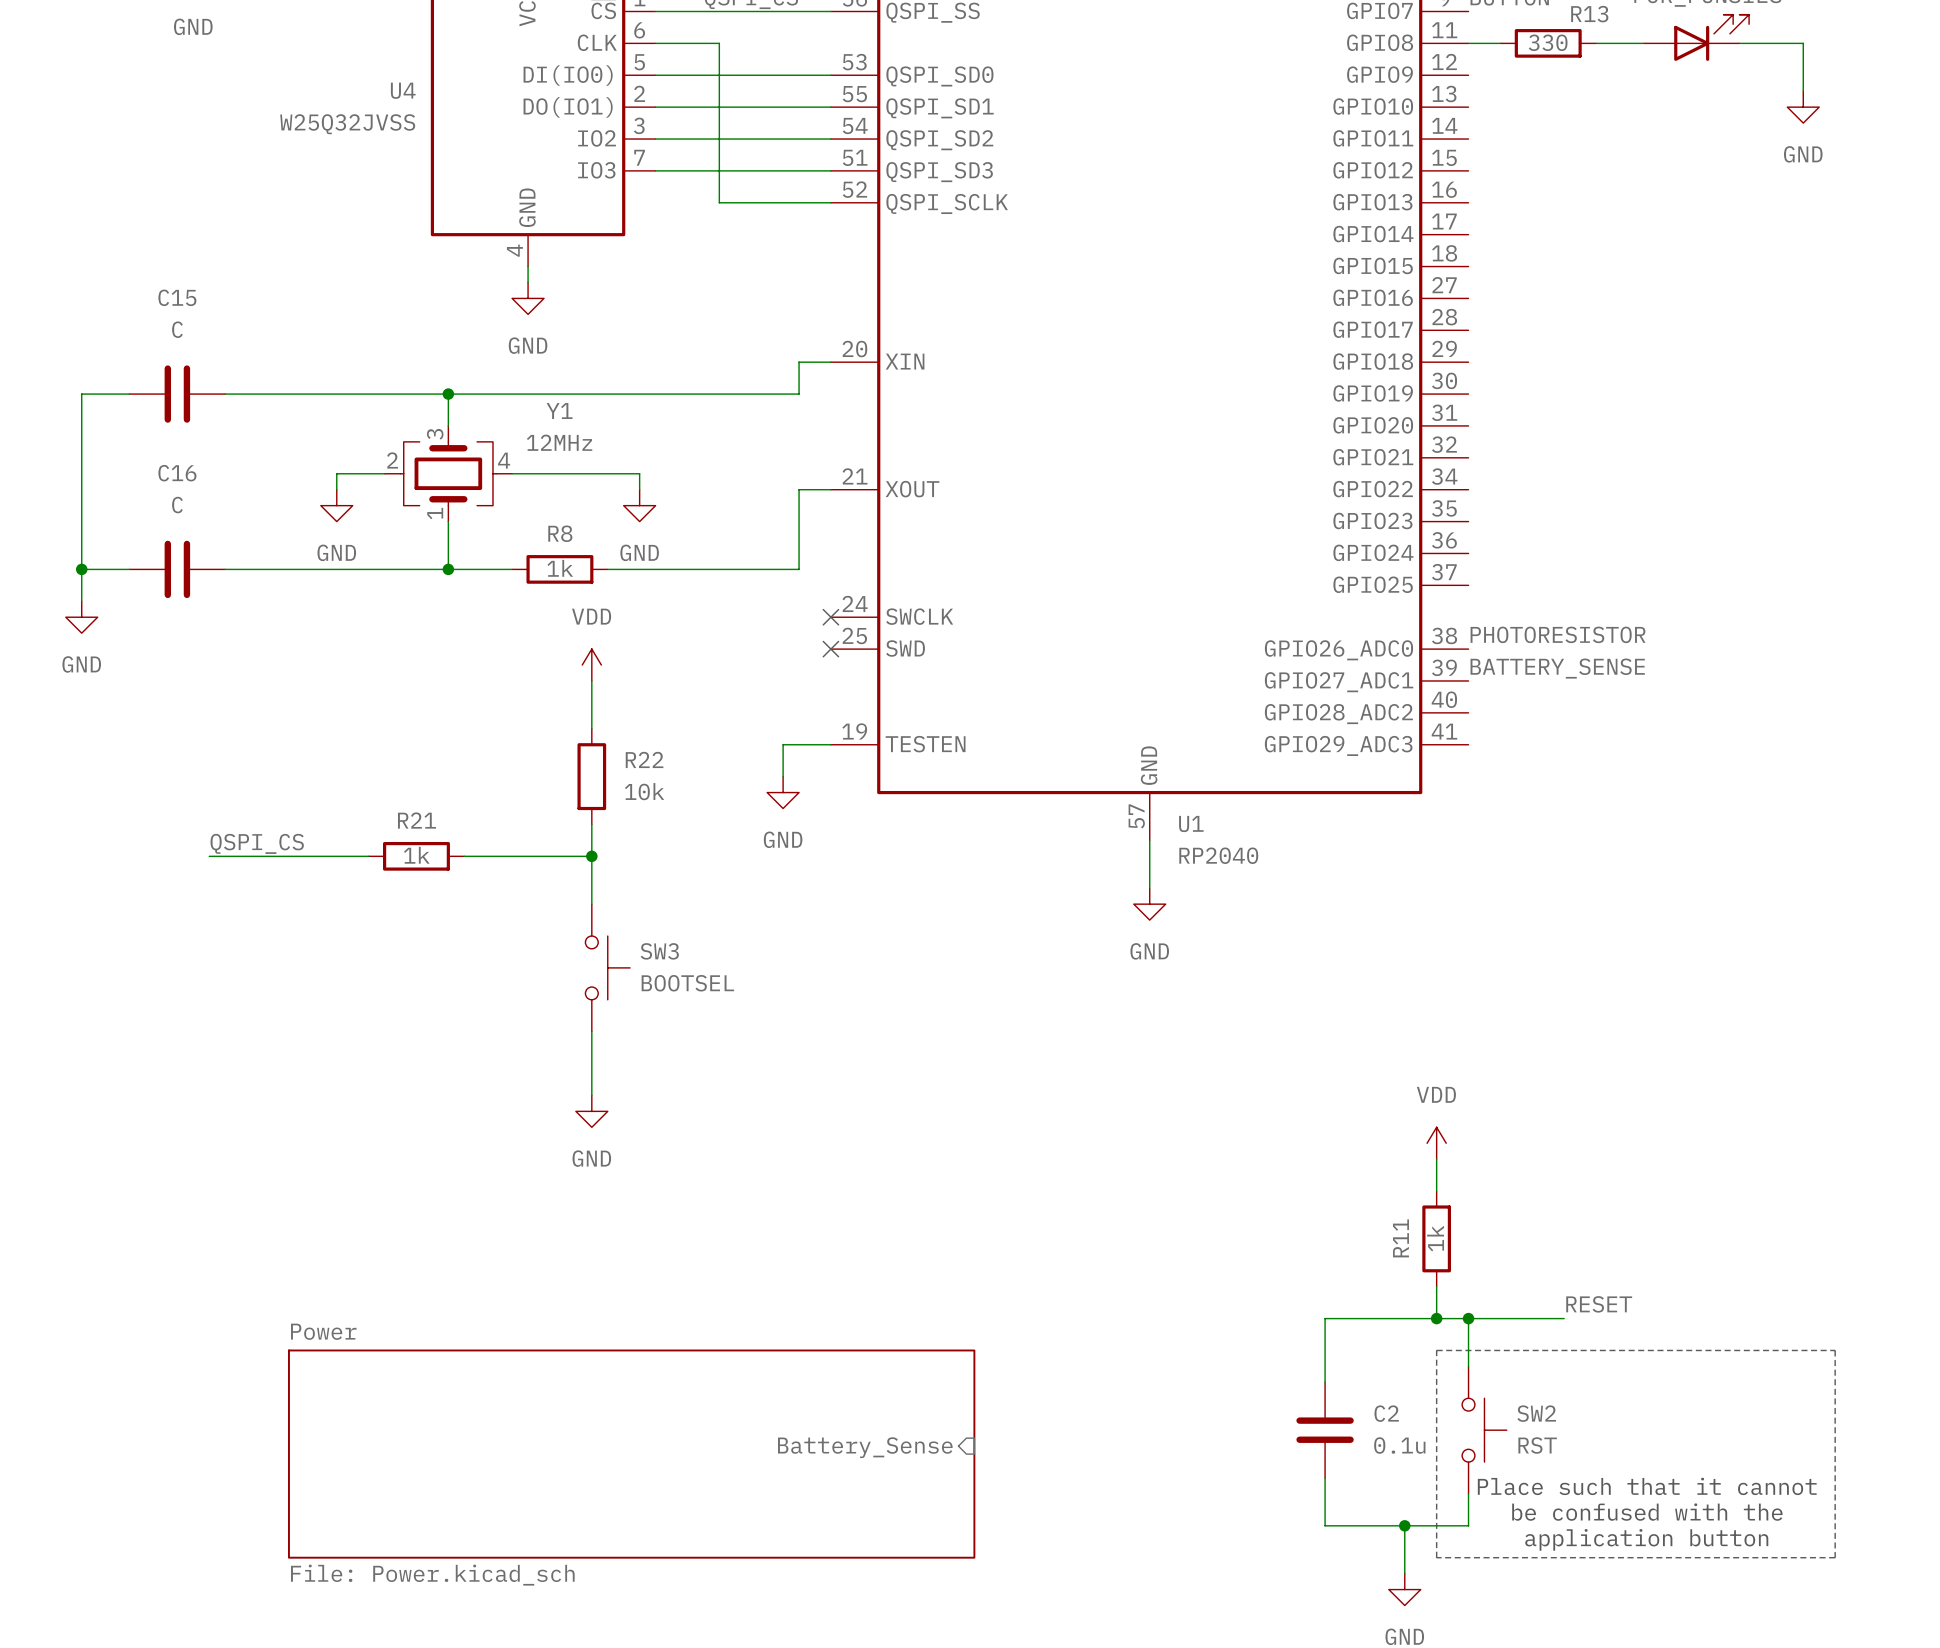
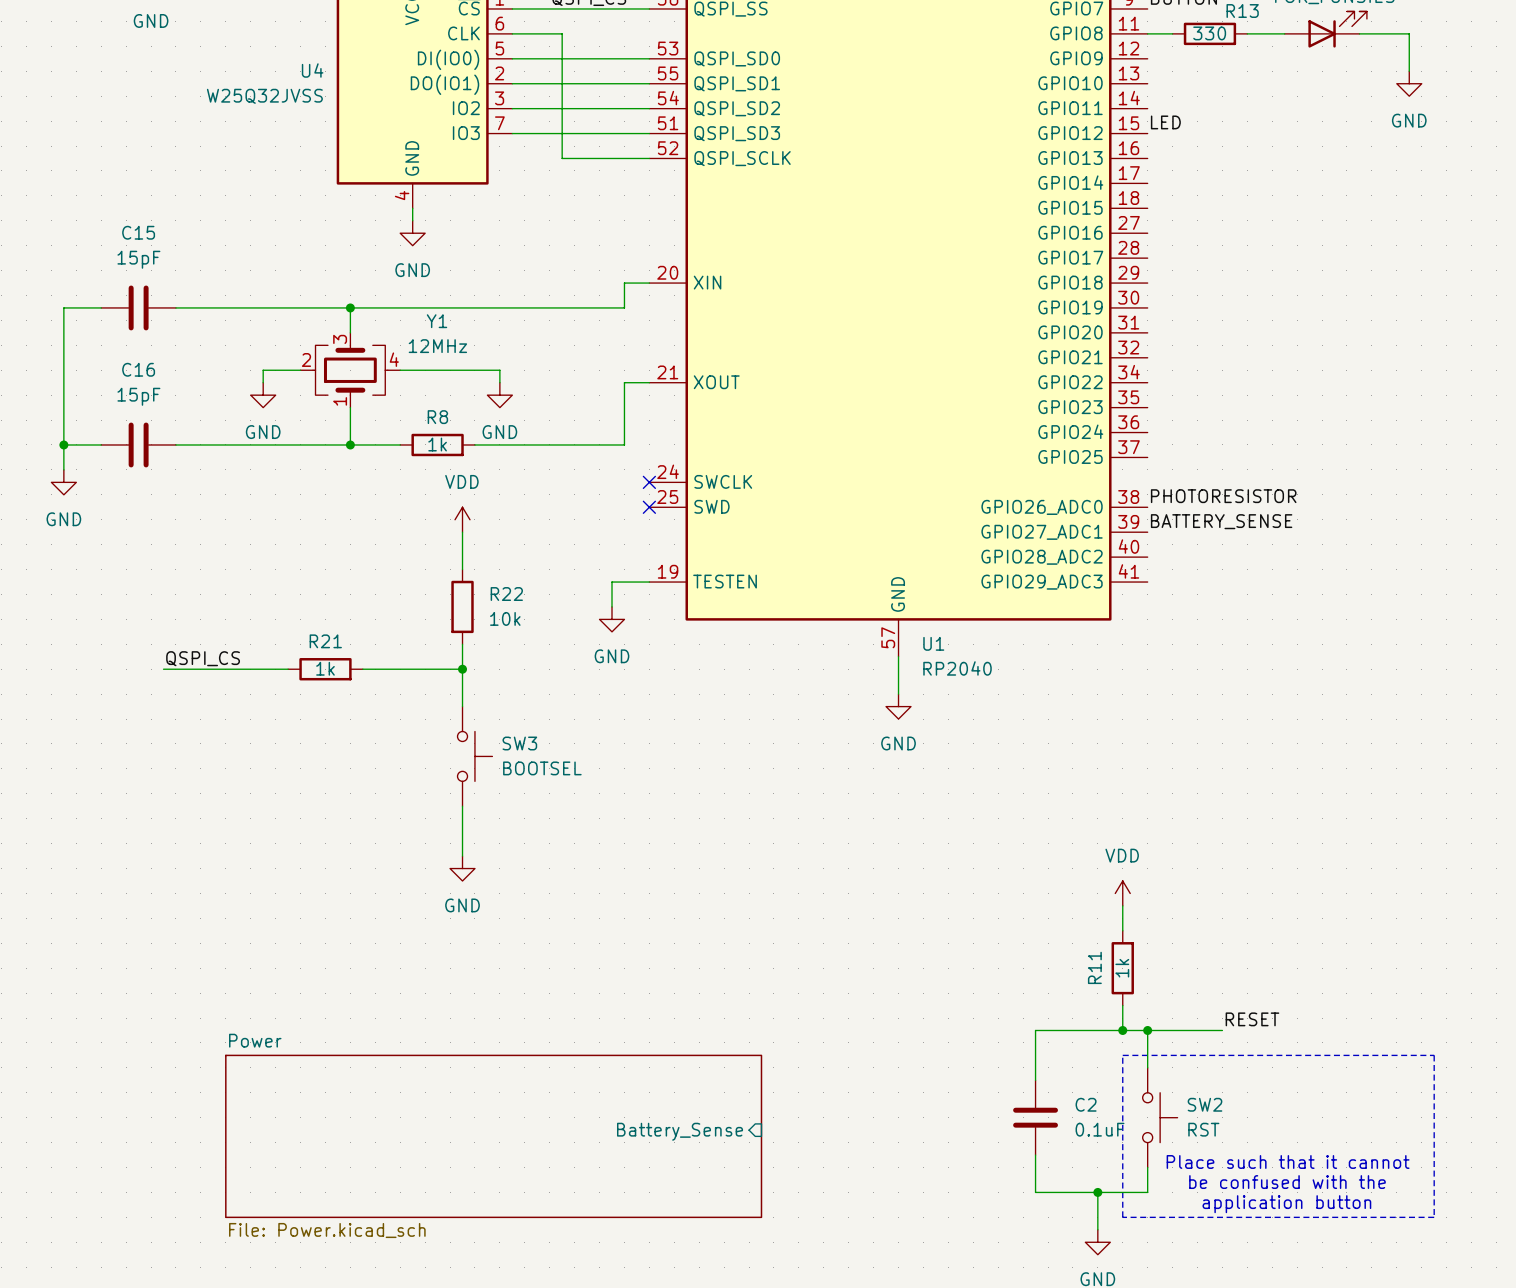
label: none -> LED (1165, 122)
C15 value: C (177, 329) -> 15pF (138, 259)
C16 value: C (177, 505) -> 15pF (138, 396)
C2 value: 0.1u (1399, 1445) -> 0.1uF (1100, 1129)

